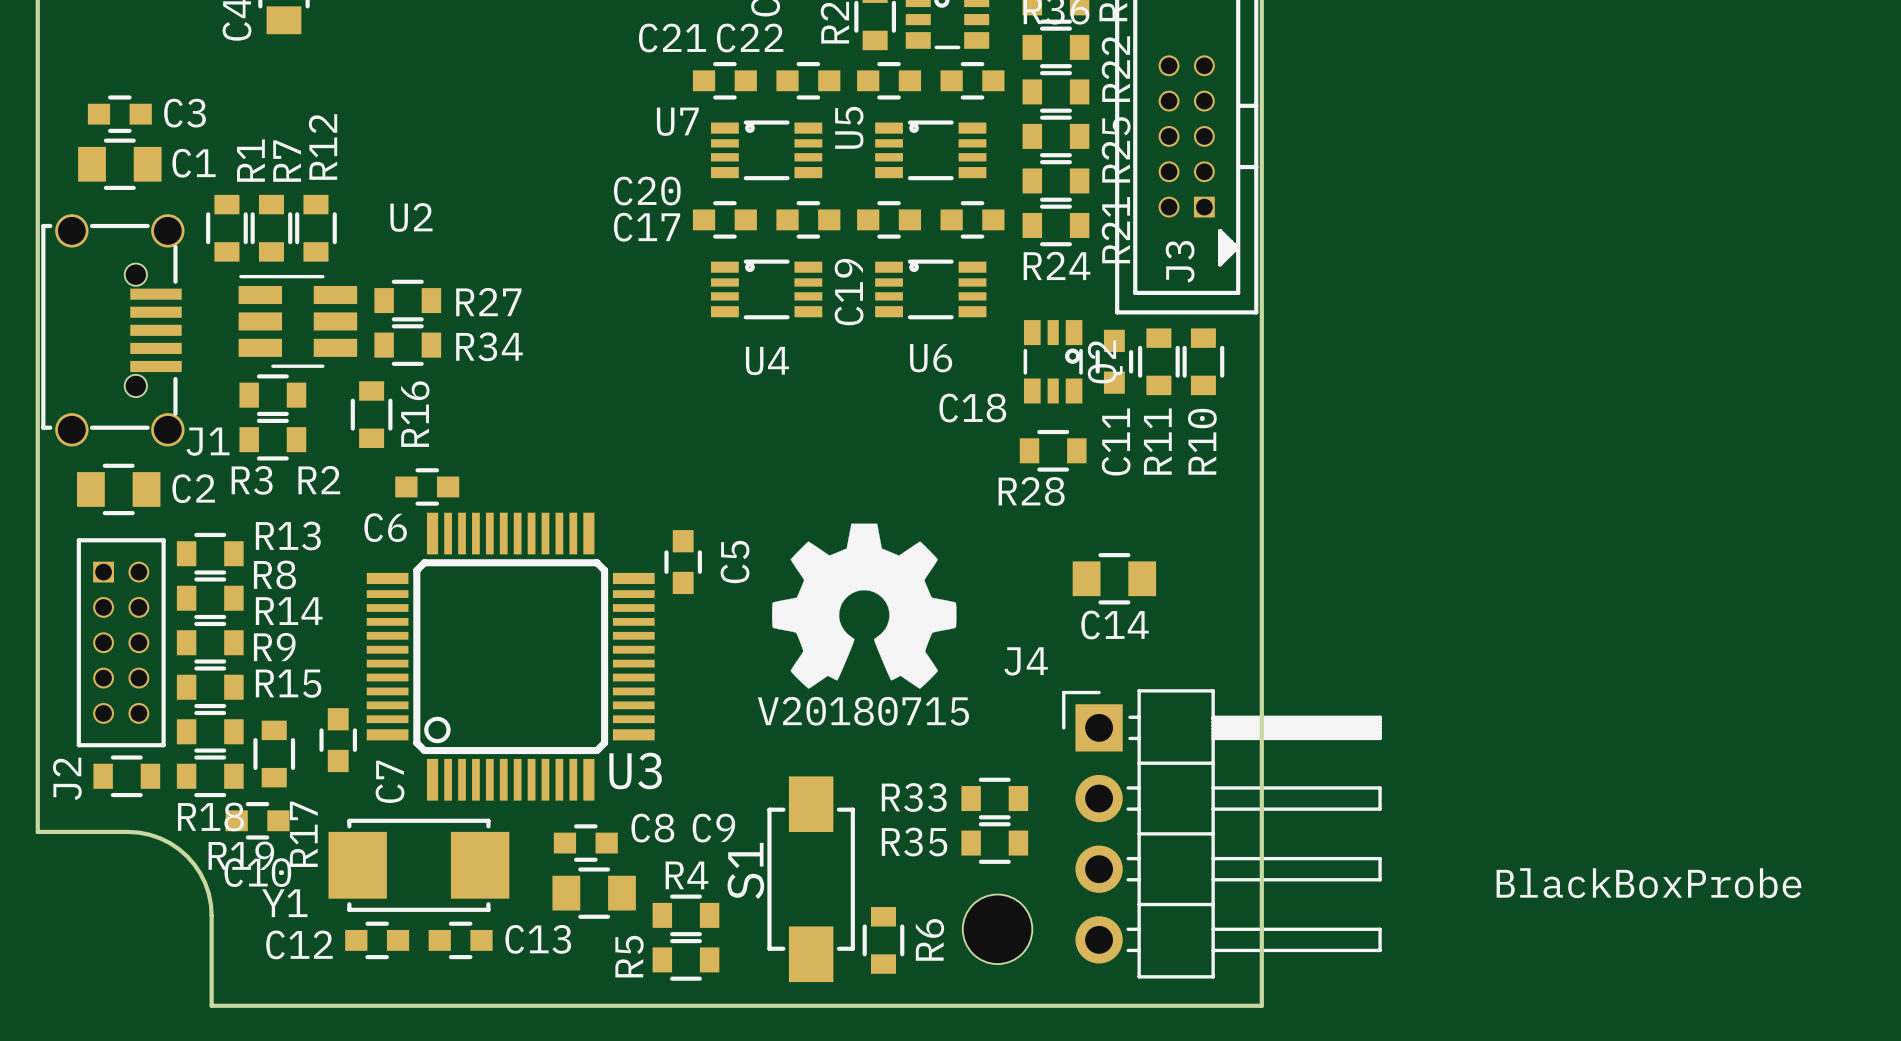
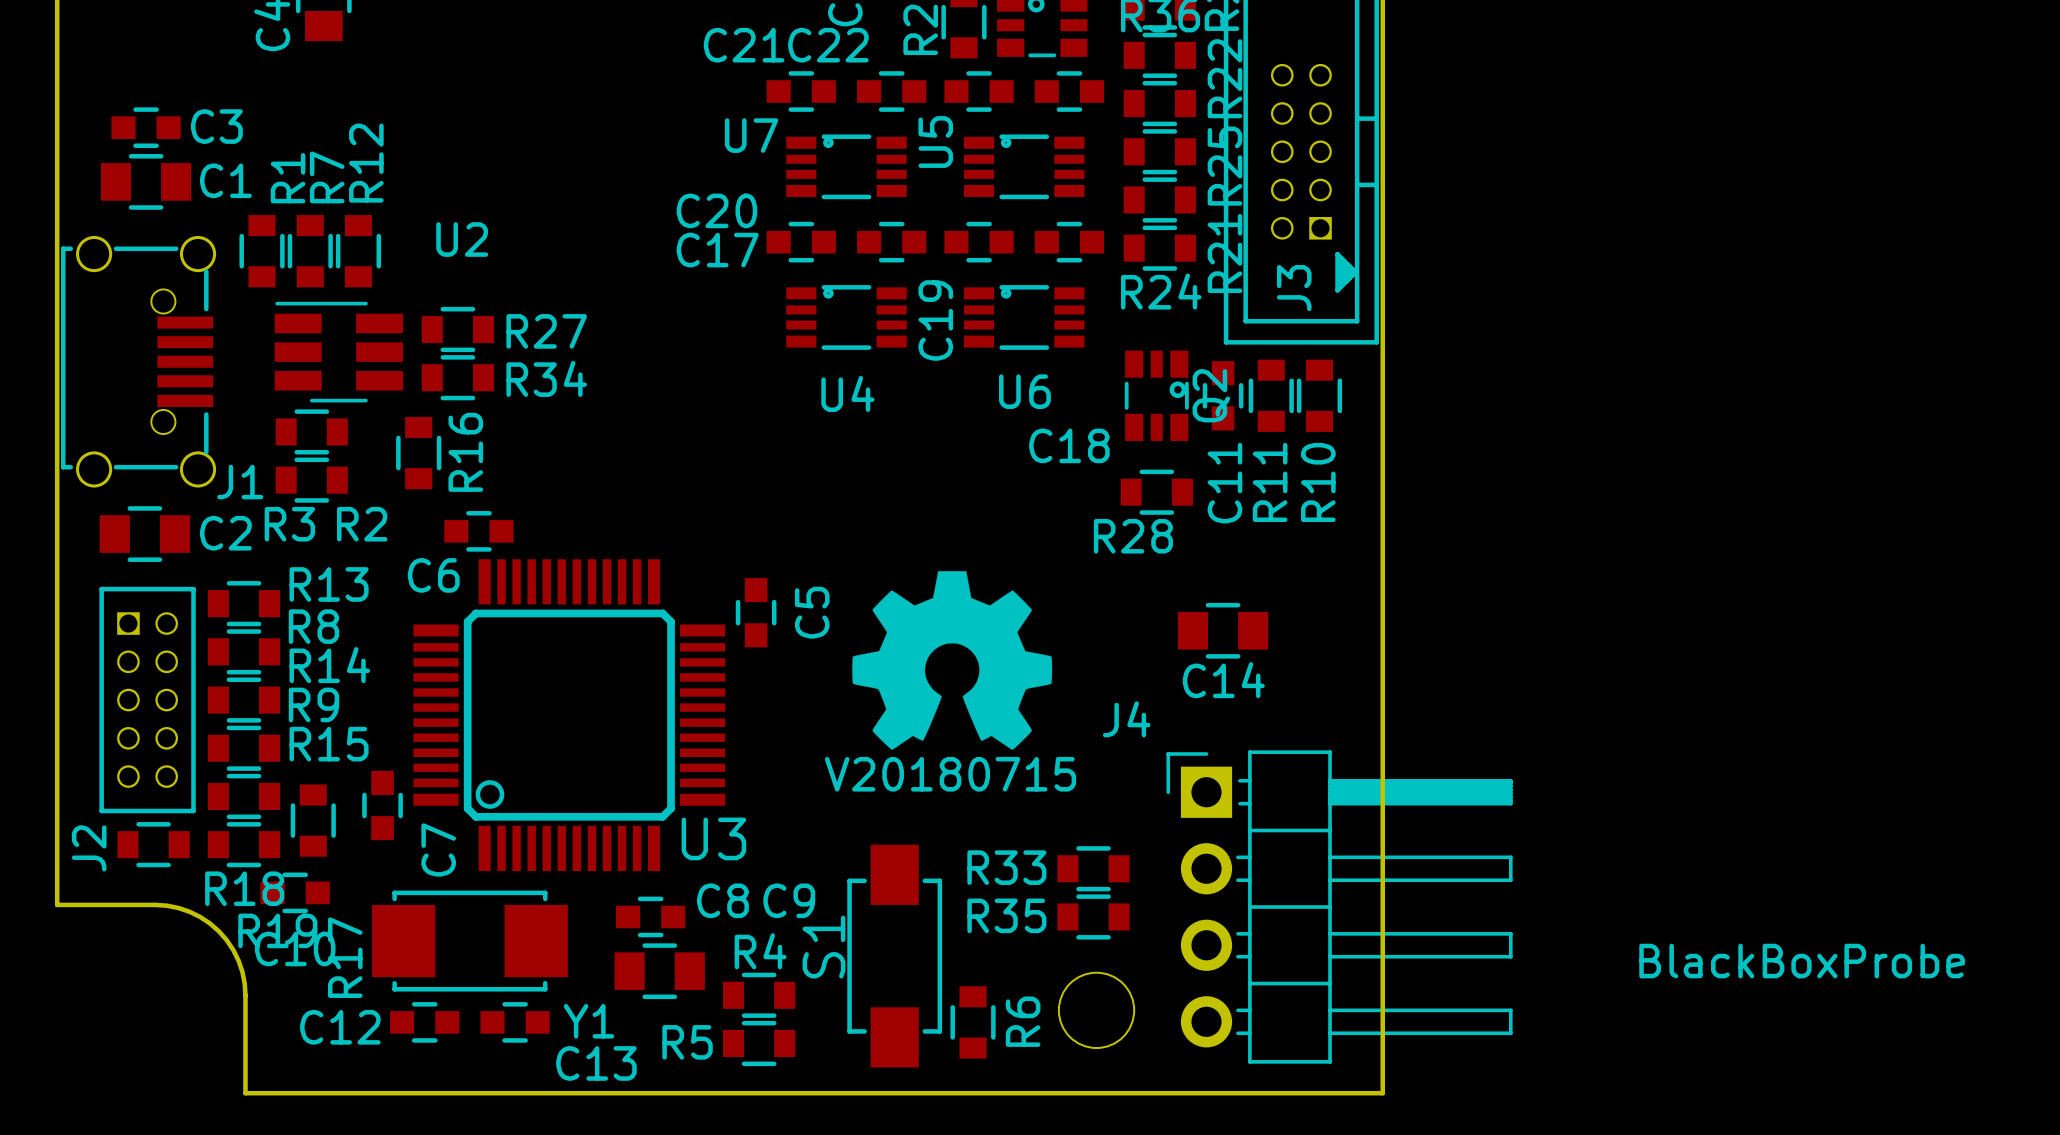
R17 name position: R17 (303, 834) -> R17 (345, 957)
Y1 name position: Y1 (284, 903) -> Y1 (588, 1021)
C13 name position: C13 (538, 939) -> C13 (596, 1063)
R5 name rotation: 0° (629, 956) -> 90° clockwise (687, 1042)

